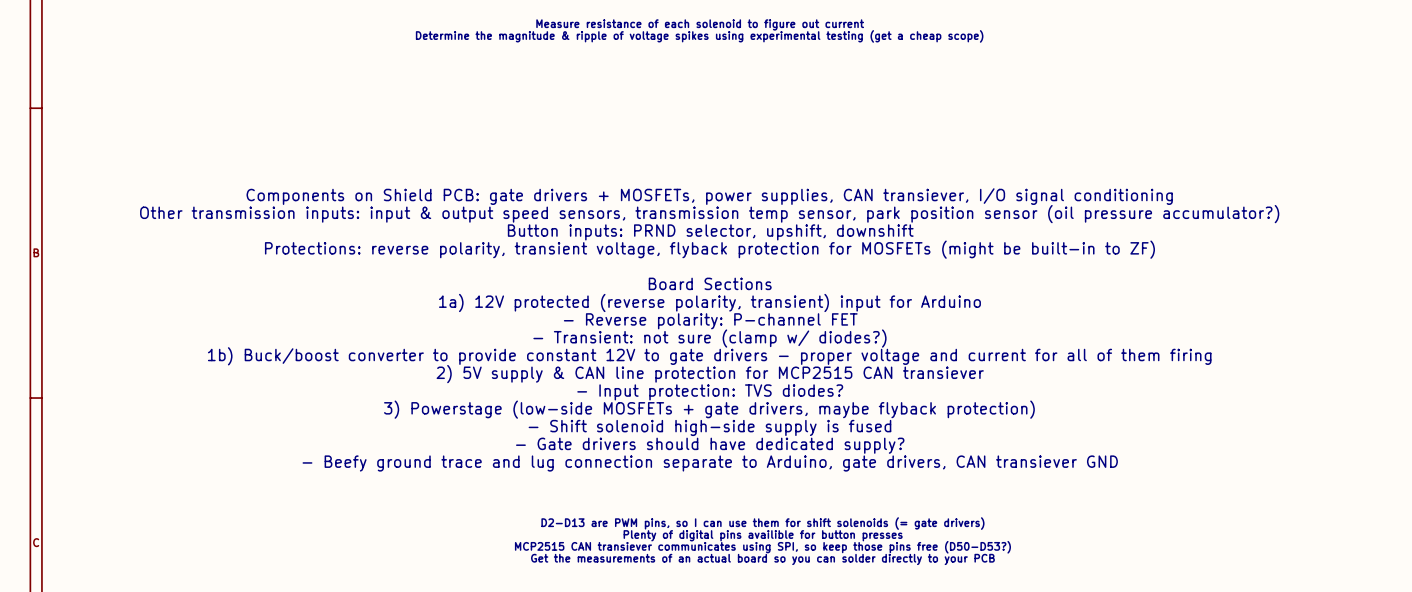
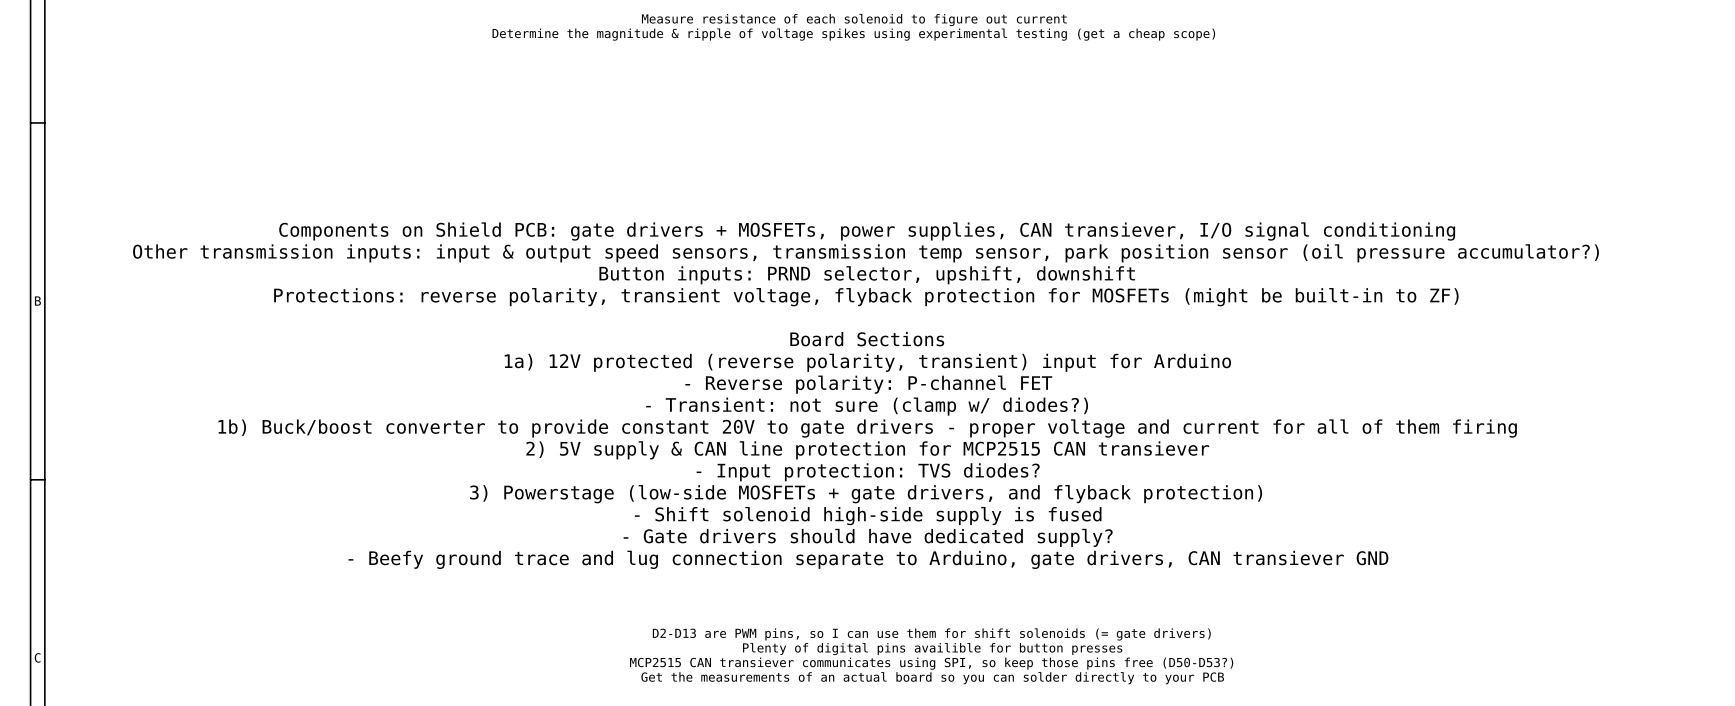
text: 1b) Buck/boost converter to provide constant 12V to gate drivers - proper voltage and current for all of them firing (709, 356) -> 1b) Buck/boost converter to provide constant 20V to gate drivers - proper voltage and current for all of them firing (867, 428)
text: 3) Powerstage (low-side MOSFETs + gate drivers, maybe flyback protection) (709, 409) -> 3) Powerstage (low-side MOSFETs + gate drivers, and flyback protection) (866, 494)

